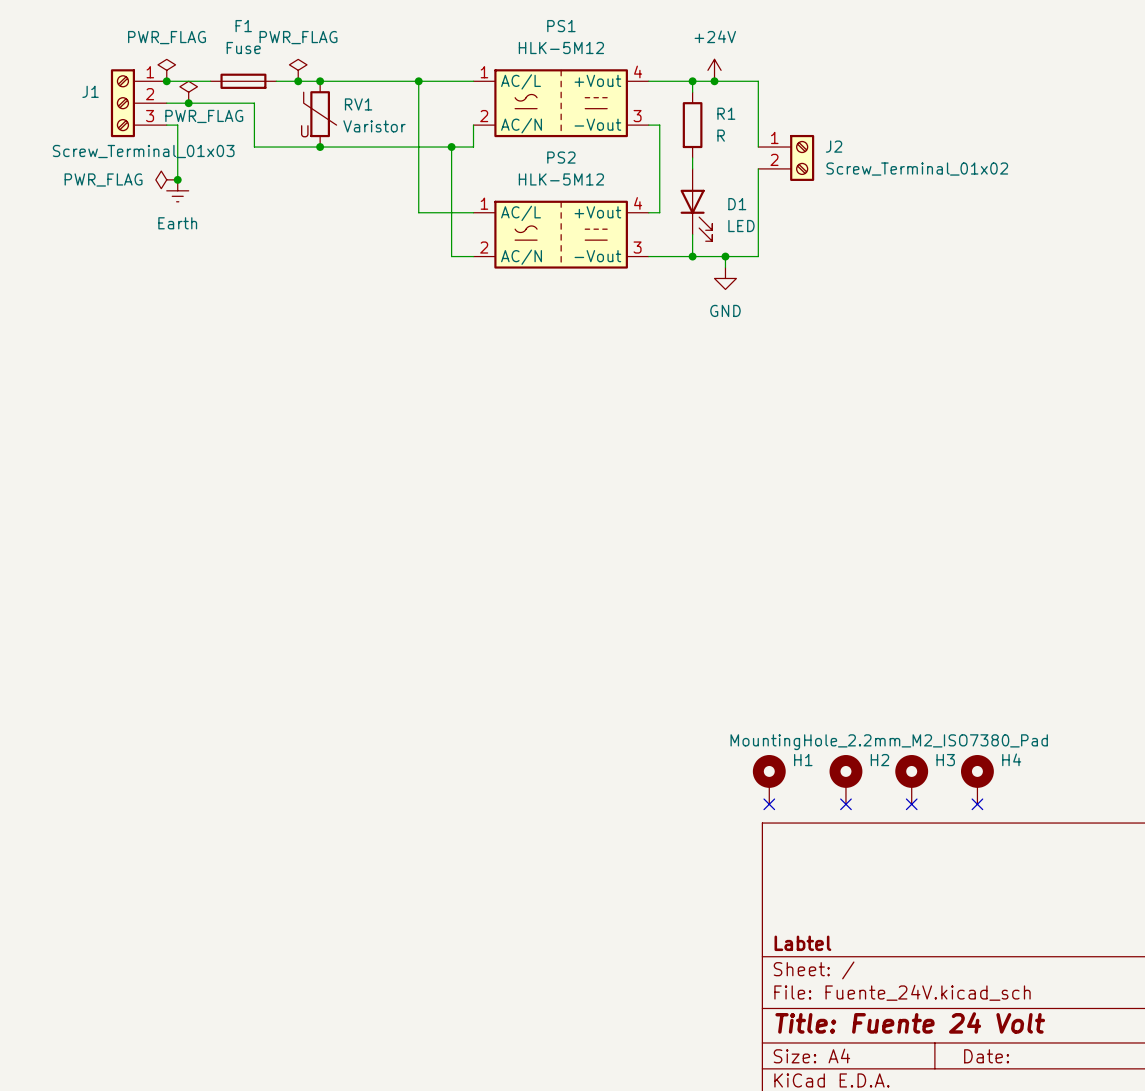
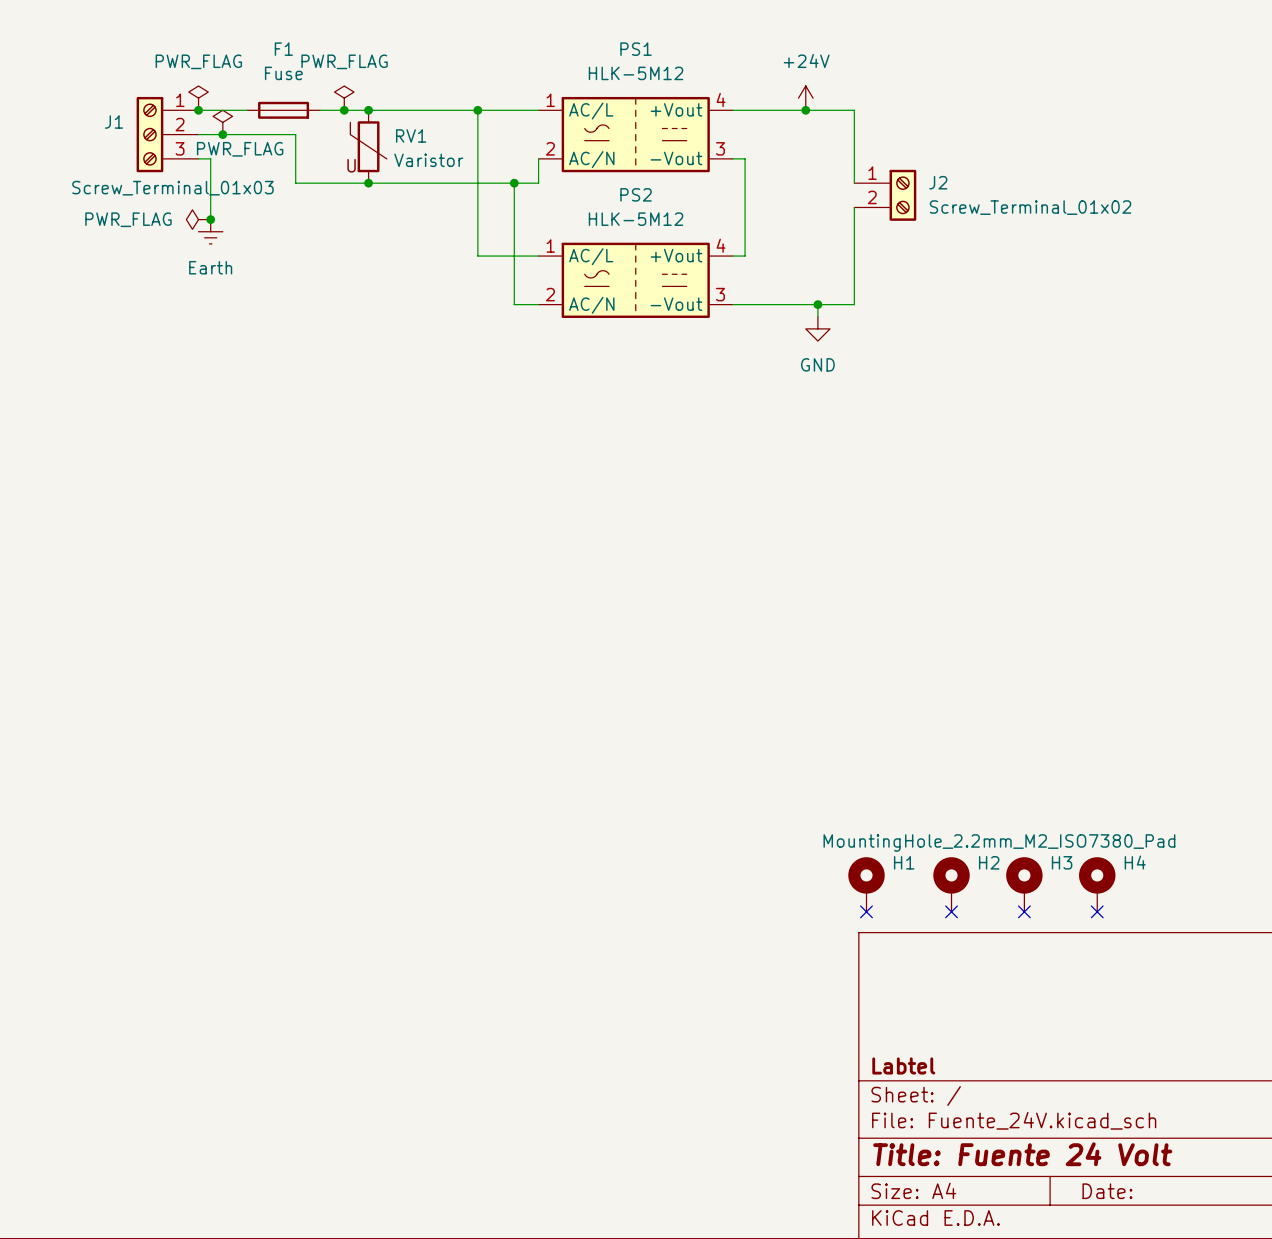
wire: (692, 81) (692, 92) -> none
junction: (692, 81) -> none
R1: R (692, 125) -> none
wire: (692, 157) (692, 168) -> none
D1: LED (696, 205) -> none
wire: (692, 234) (692, 256) -> none
junction: (692, 256) -> none

